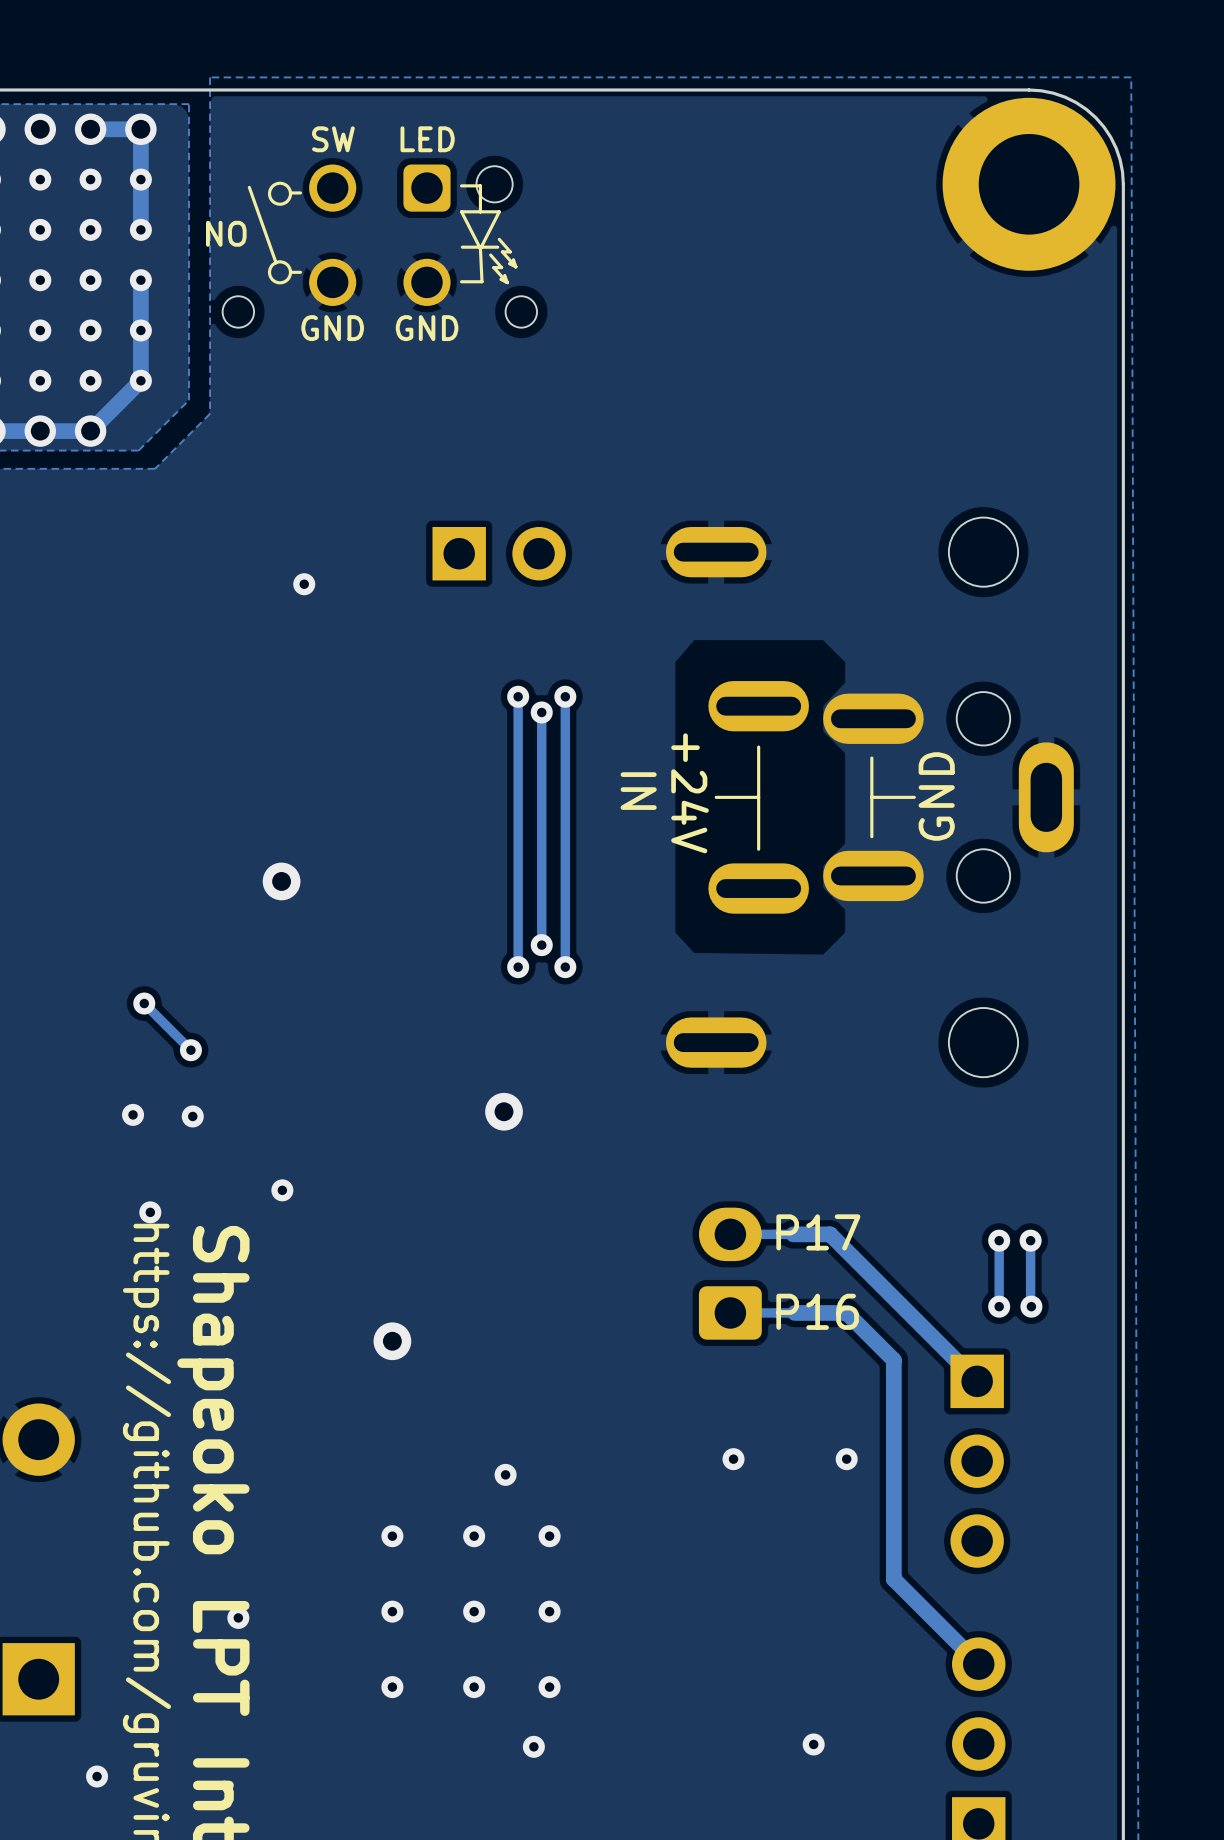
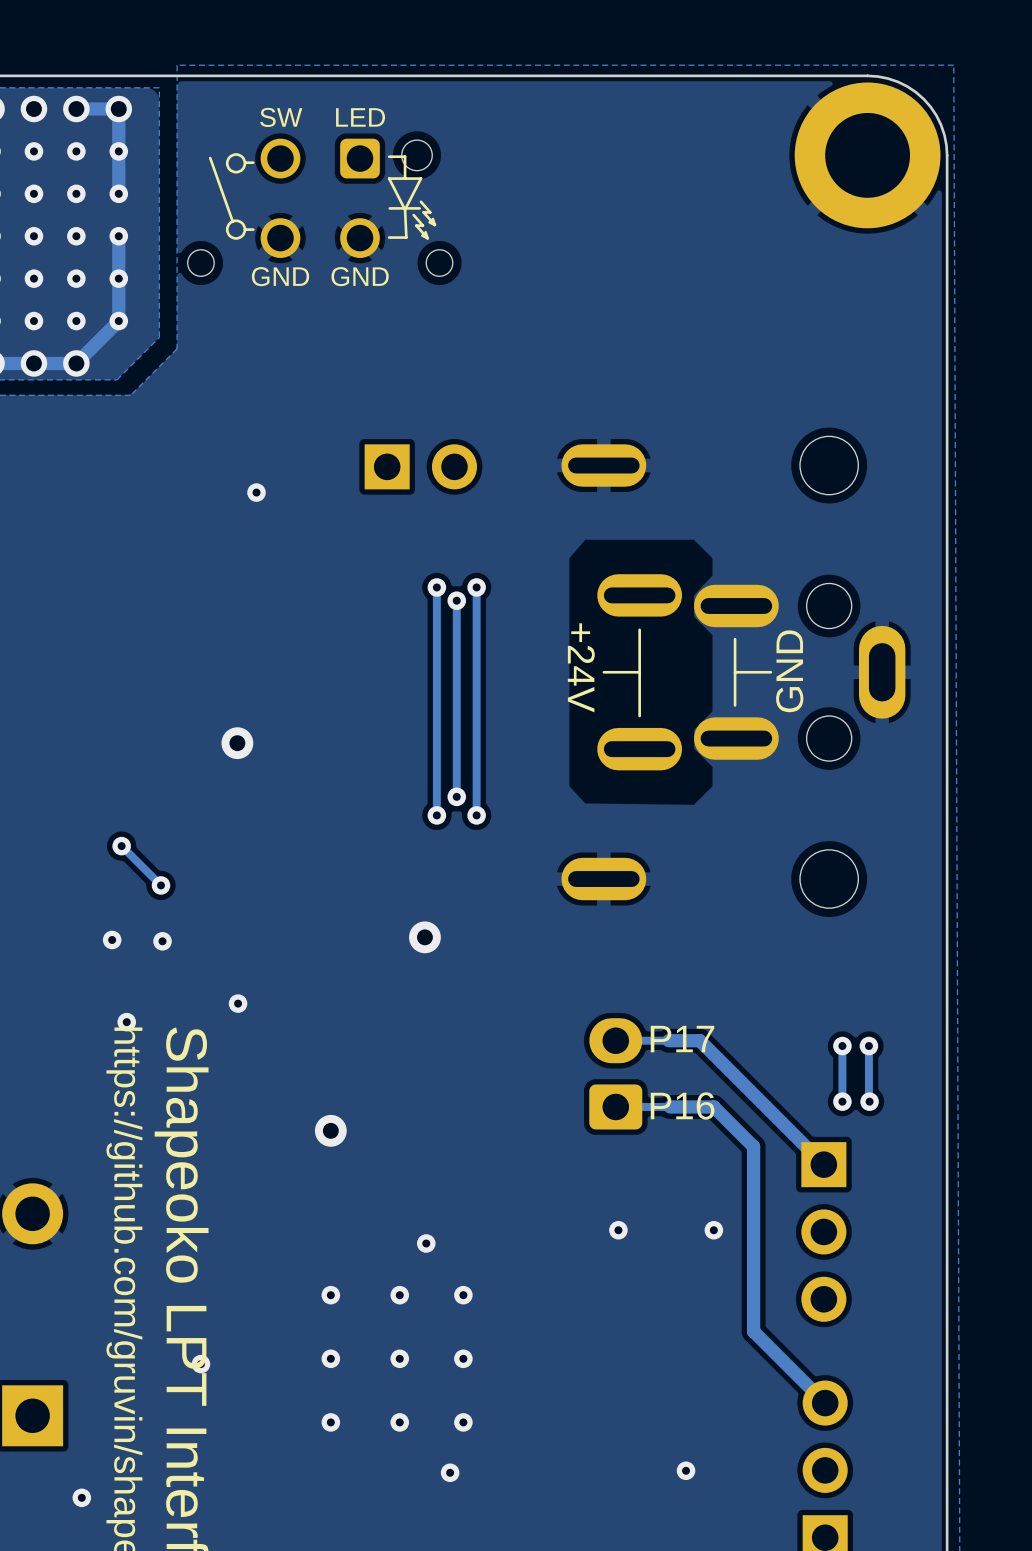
text: NO (226, 233) -> none
text: IN (638, 791) -> none

